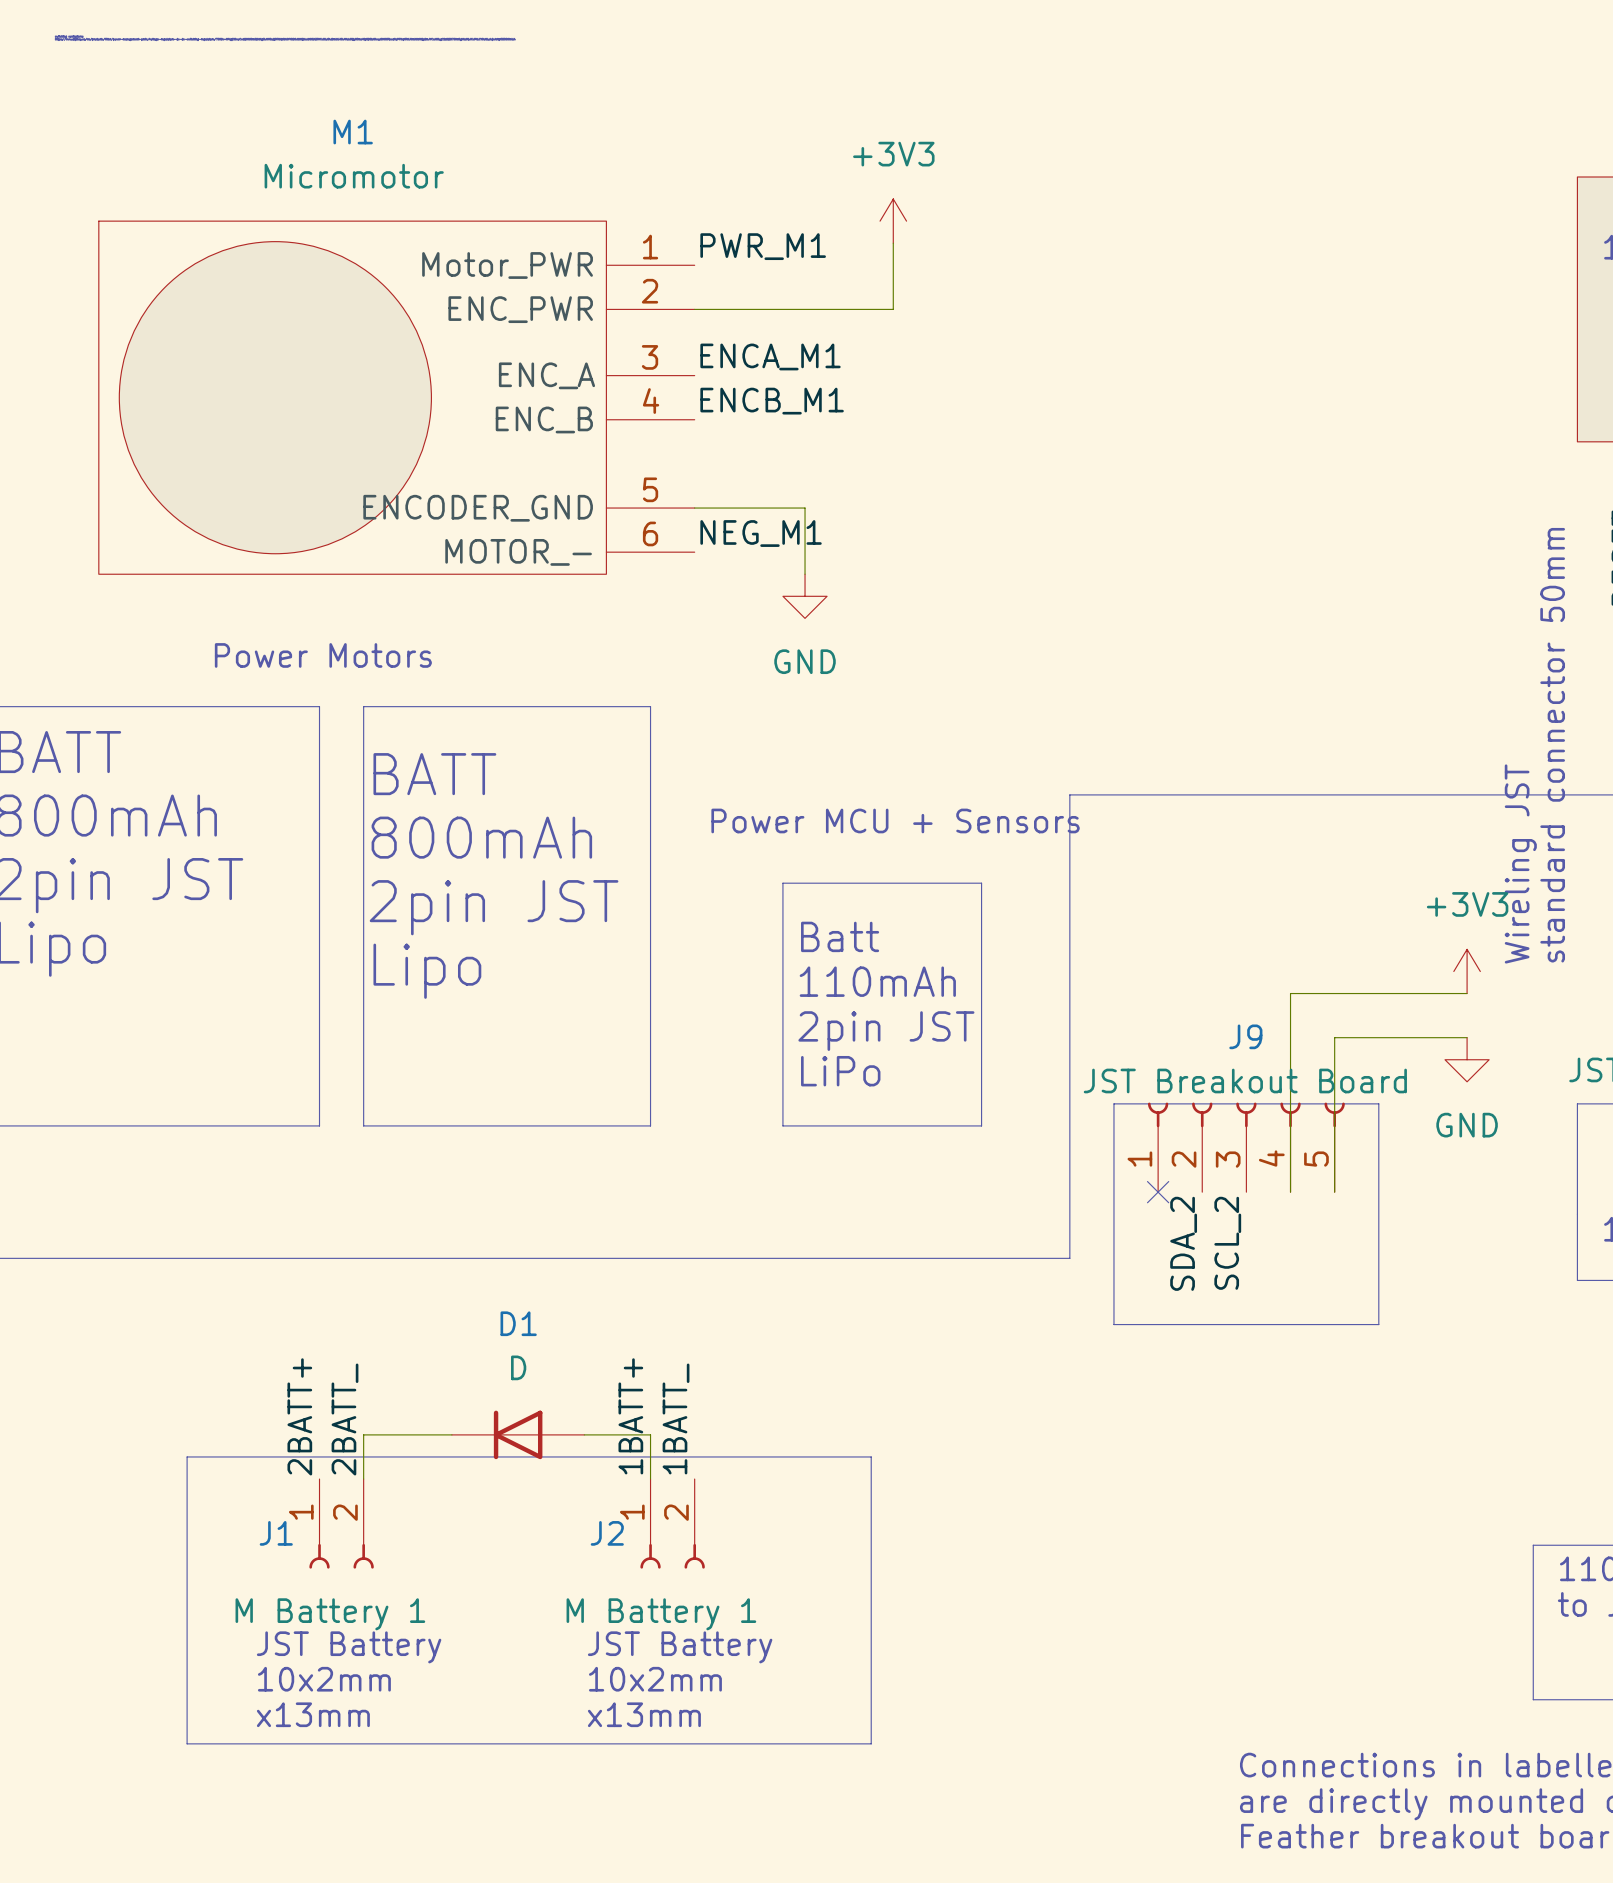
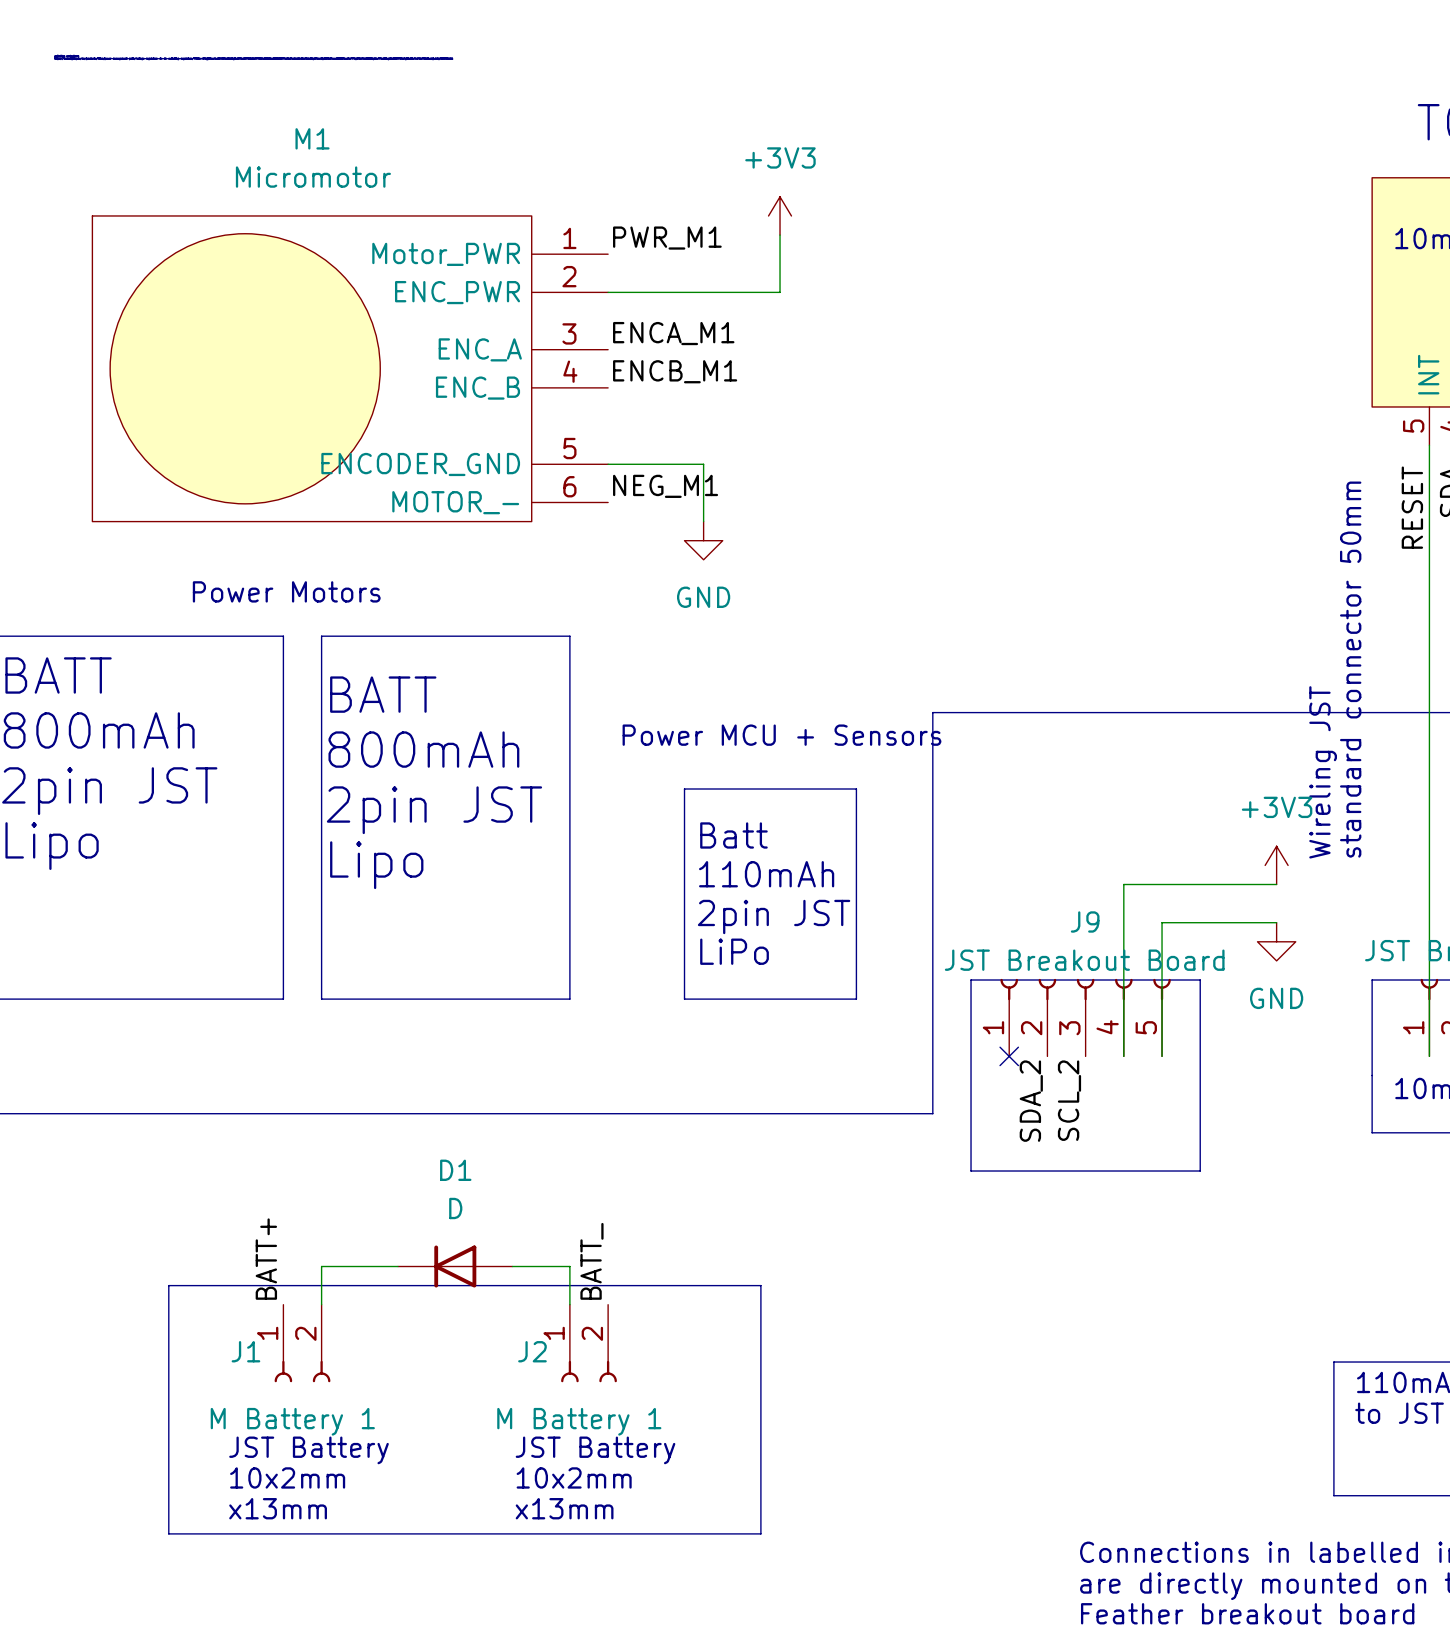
label: 2BATT+ (299, 1416) -> BATT+ (266, 1259)
label: 1BATT+ (630, 1416) -> none
label: 1BATT_ (676, 1418) -> BATT_ (591, 1261)
label: 2BATT_ (345, 1419) -> none

